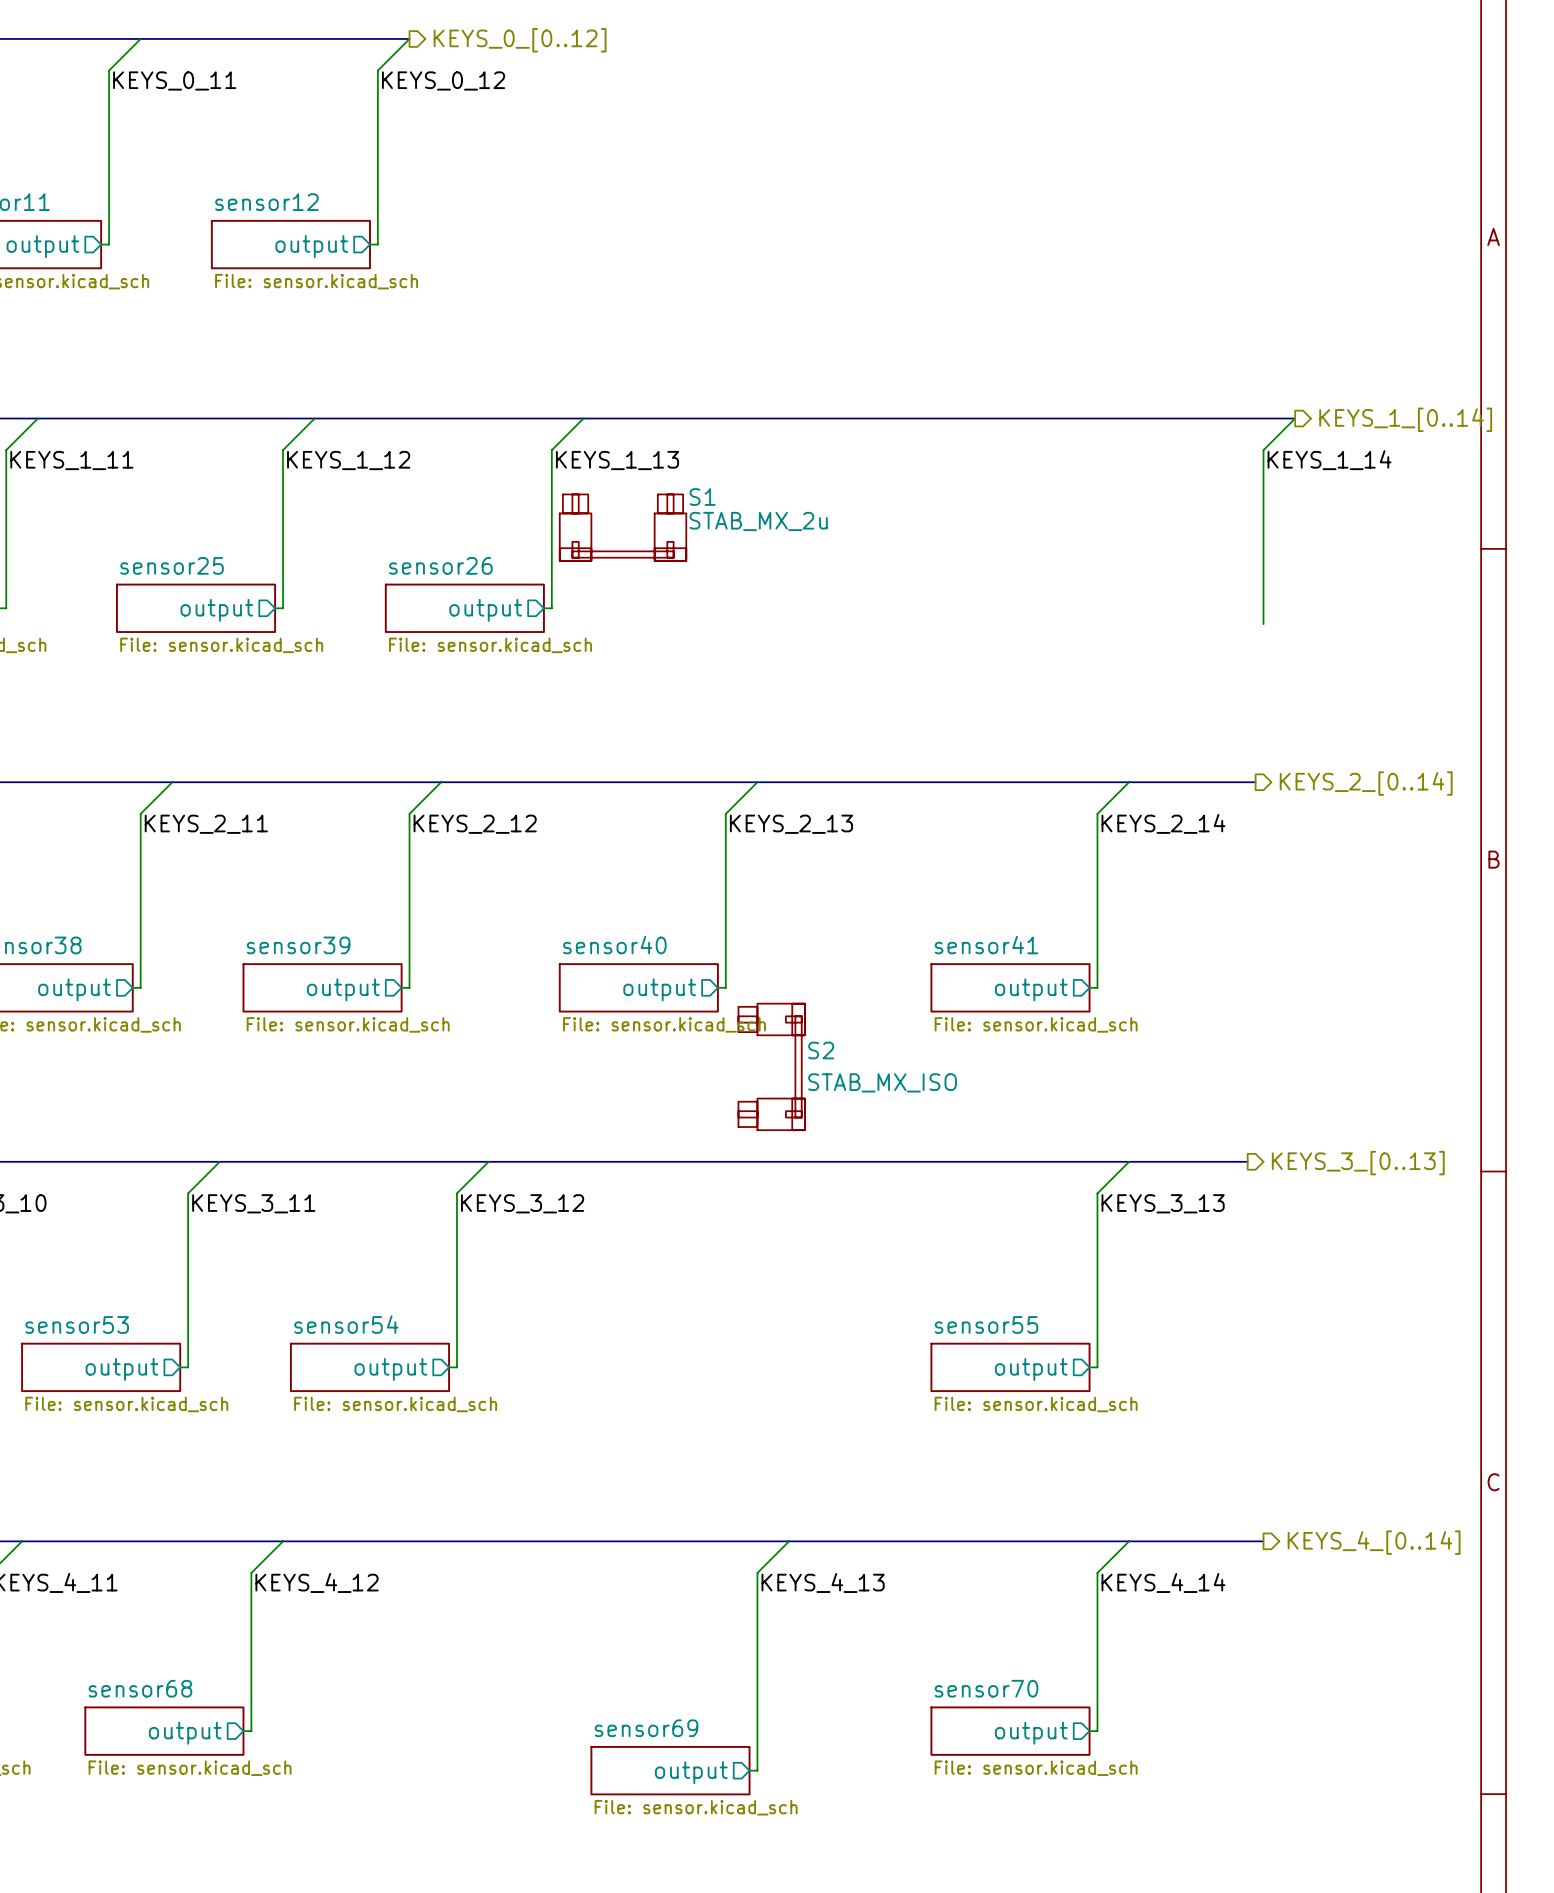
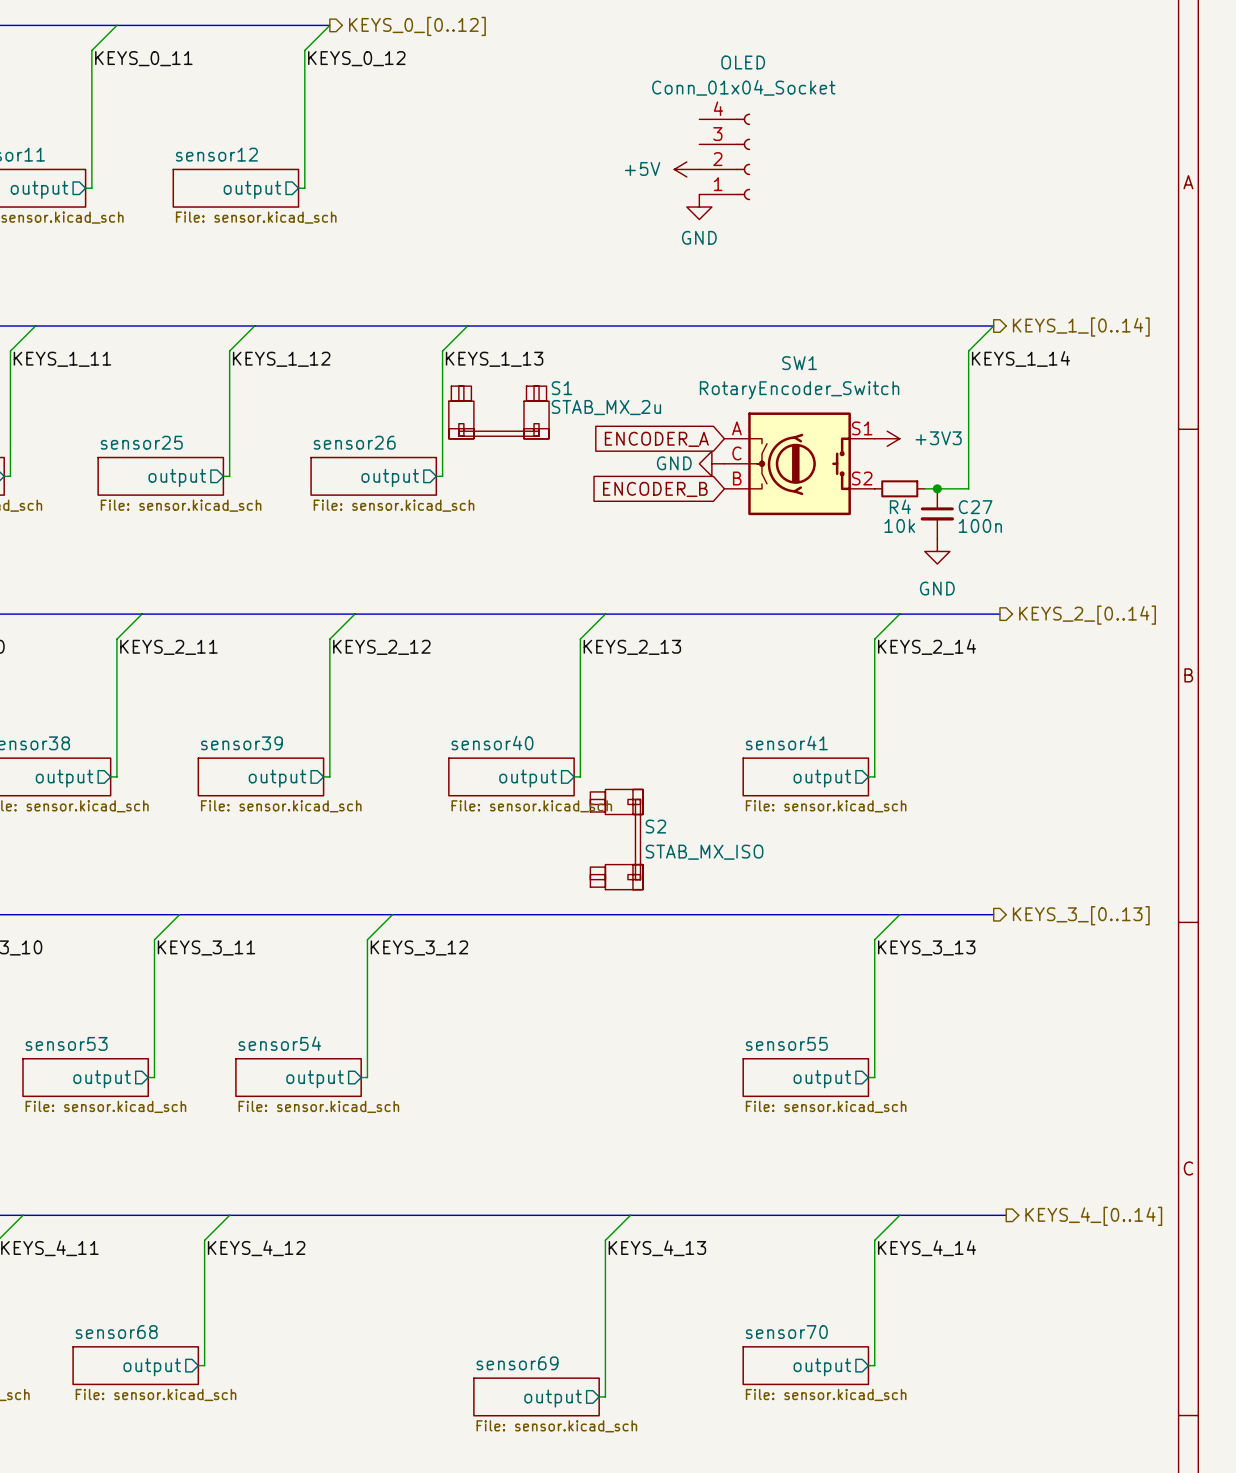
OLED: none -> Conn_01x04_Socket (724, 156)
power symbol: none -> +5V (686, 169)
power symbol: none -> GND (699, 207)
wire: none -> (993, 326) (968, 351) (968, 488) (924, 488)
bus: (1247, 418) (1295, 418) -> none
wire: (1295, 418) (1263, 450) (1263, 624) -> none
hierarchical label position: KEYS_1_[0..14] (1405, 419) -> KEYS_1_[0..14] (1081, 327)
label position: KEYS_1_14 (1329, 460) -> KEYS_1_14 (1020, 358)
power symbol: none -> +3V3 (887, 438)
global label: none -> ENCODER_A (656, 439)
power symbol: none -> GND (711, 463)
SW1: none -> RotaryEncoder_Switch (799, 463)
global label: none -> ENCODER_B (655, 489)
R4: none -> 10k (899, 488)
junction: none -> (937, 488)
C27: none -> 100n (937, 513)
power symbol: none -> GND (937, 551)

